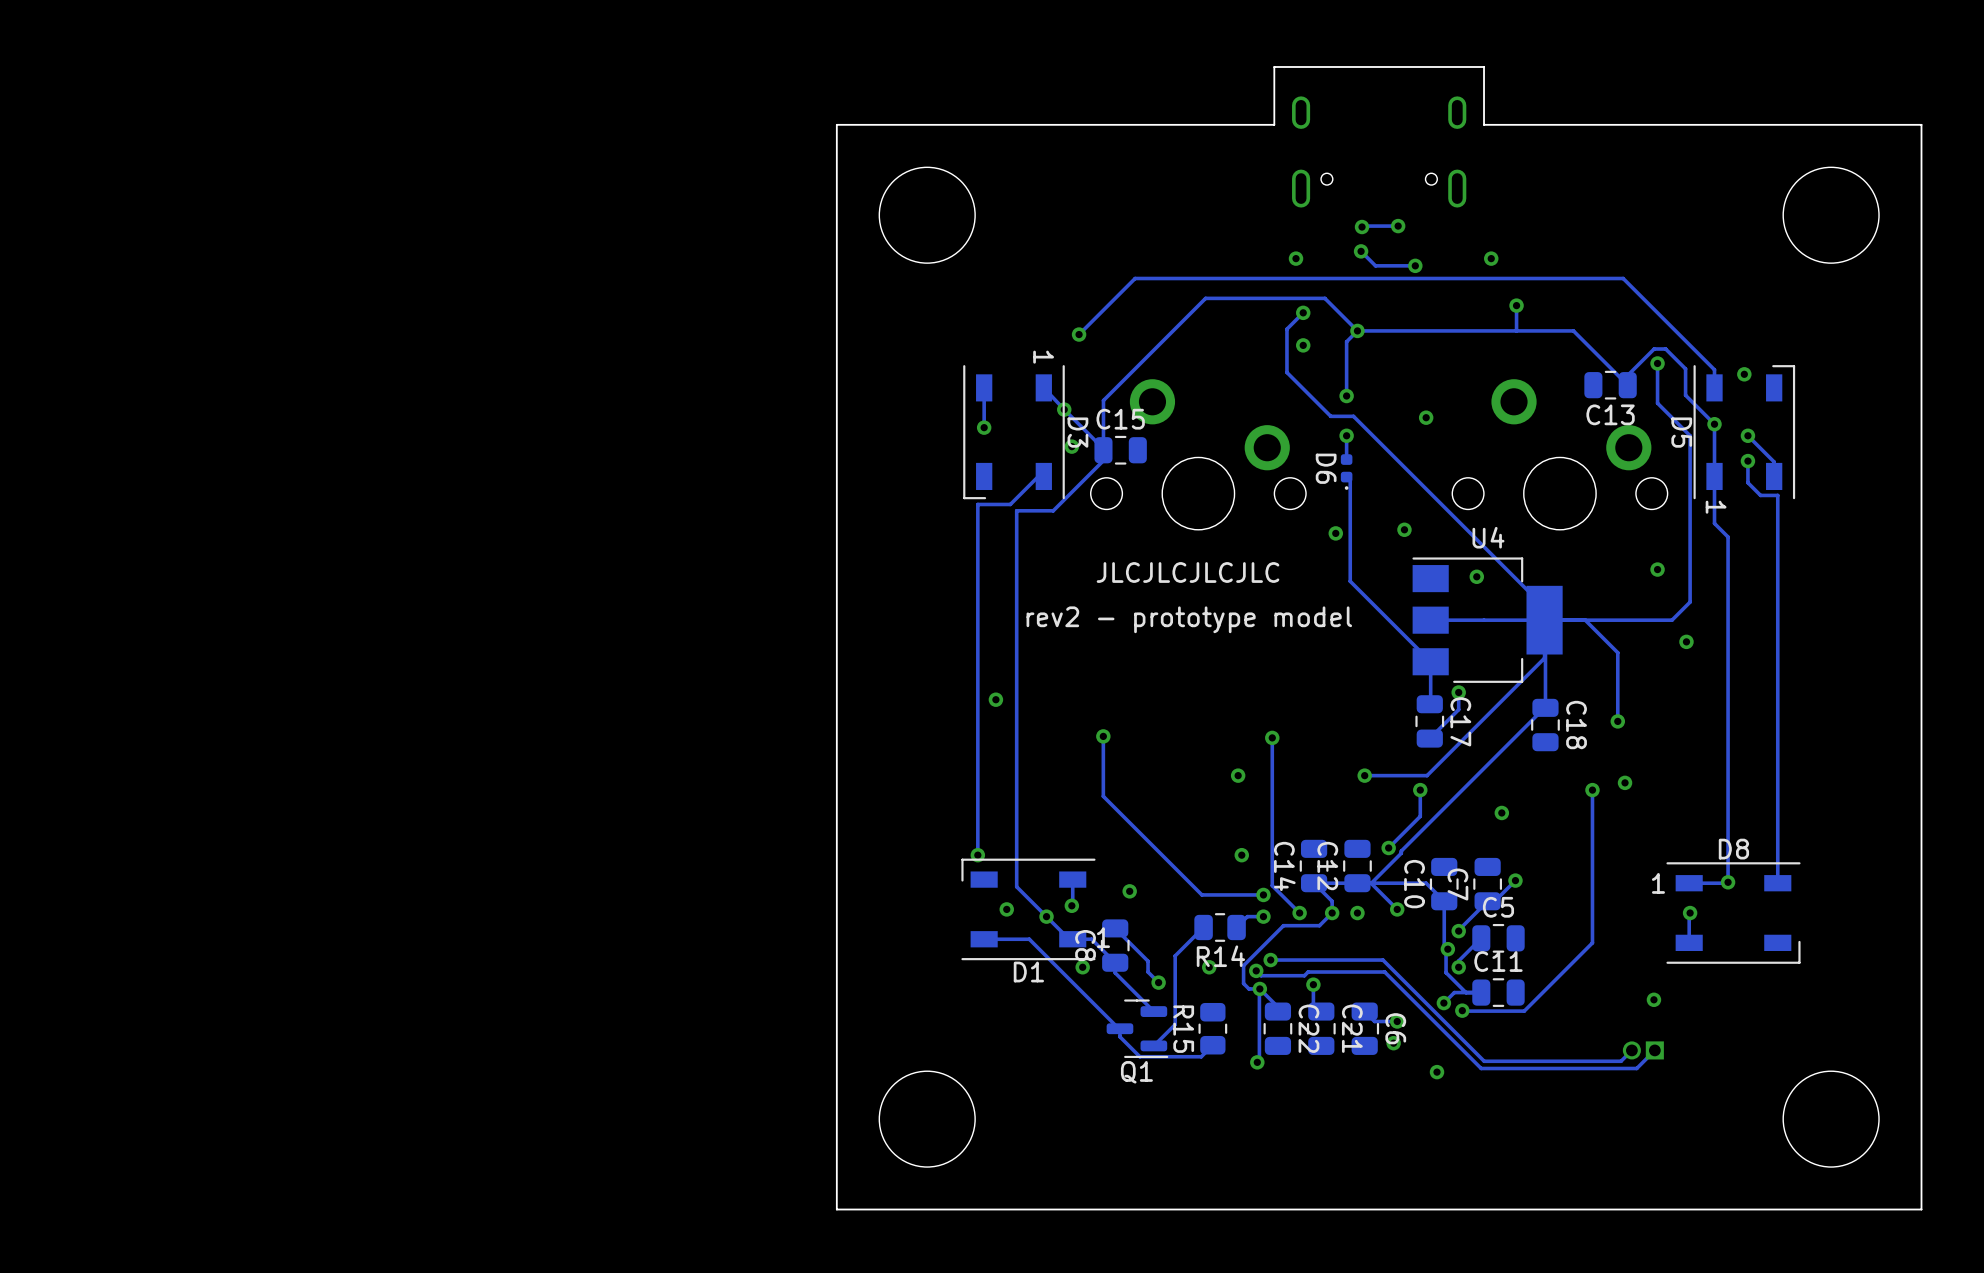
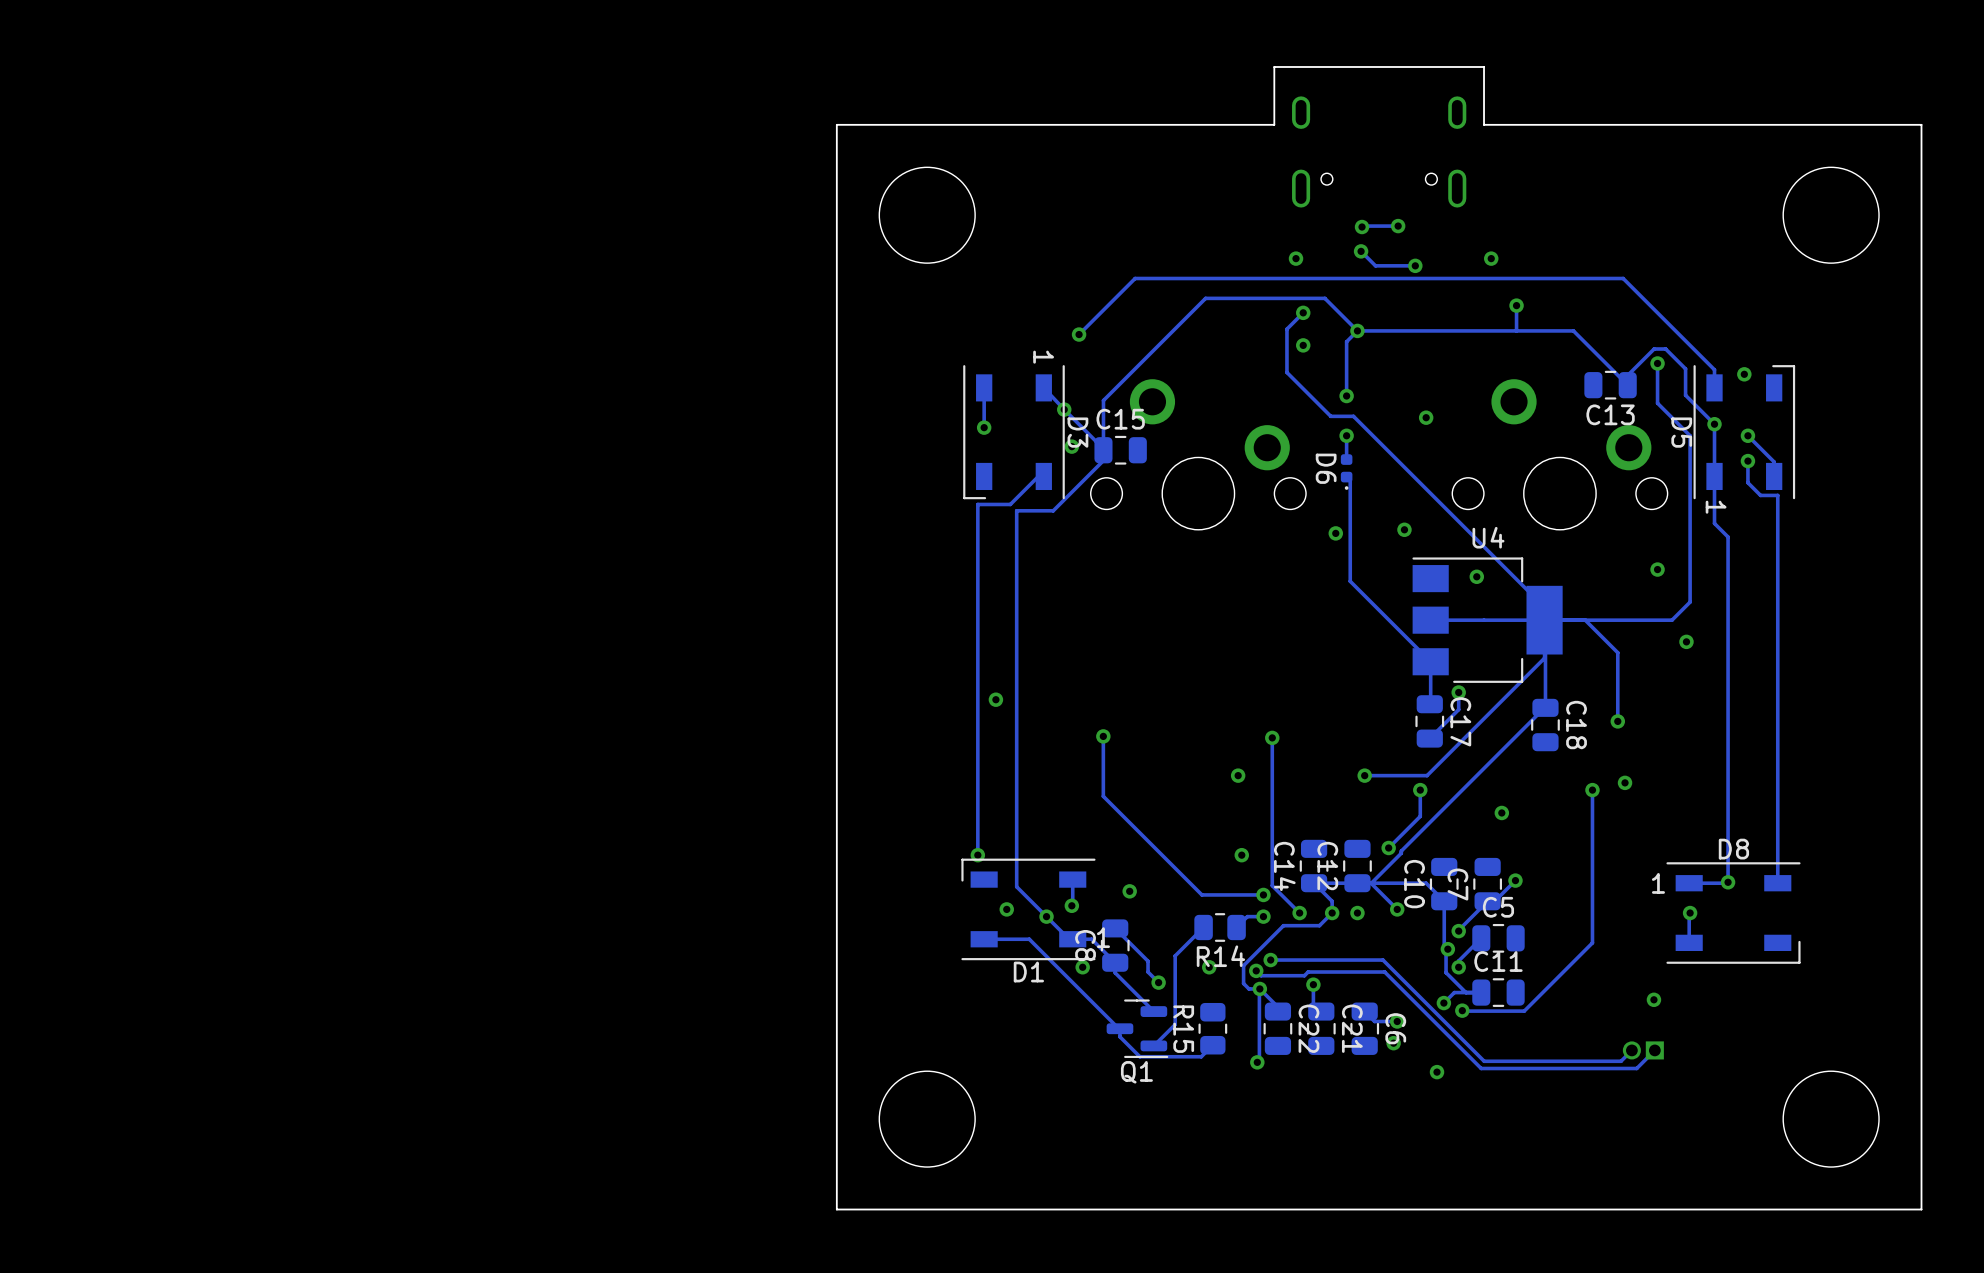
text: JLCJLCJLCJLC (1188, 572) -> none
text: rev2 - prototype model (1189, 619) -> none

